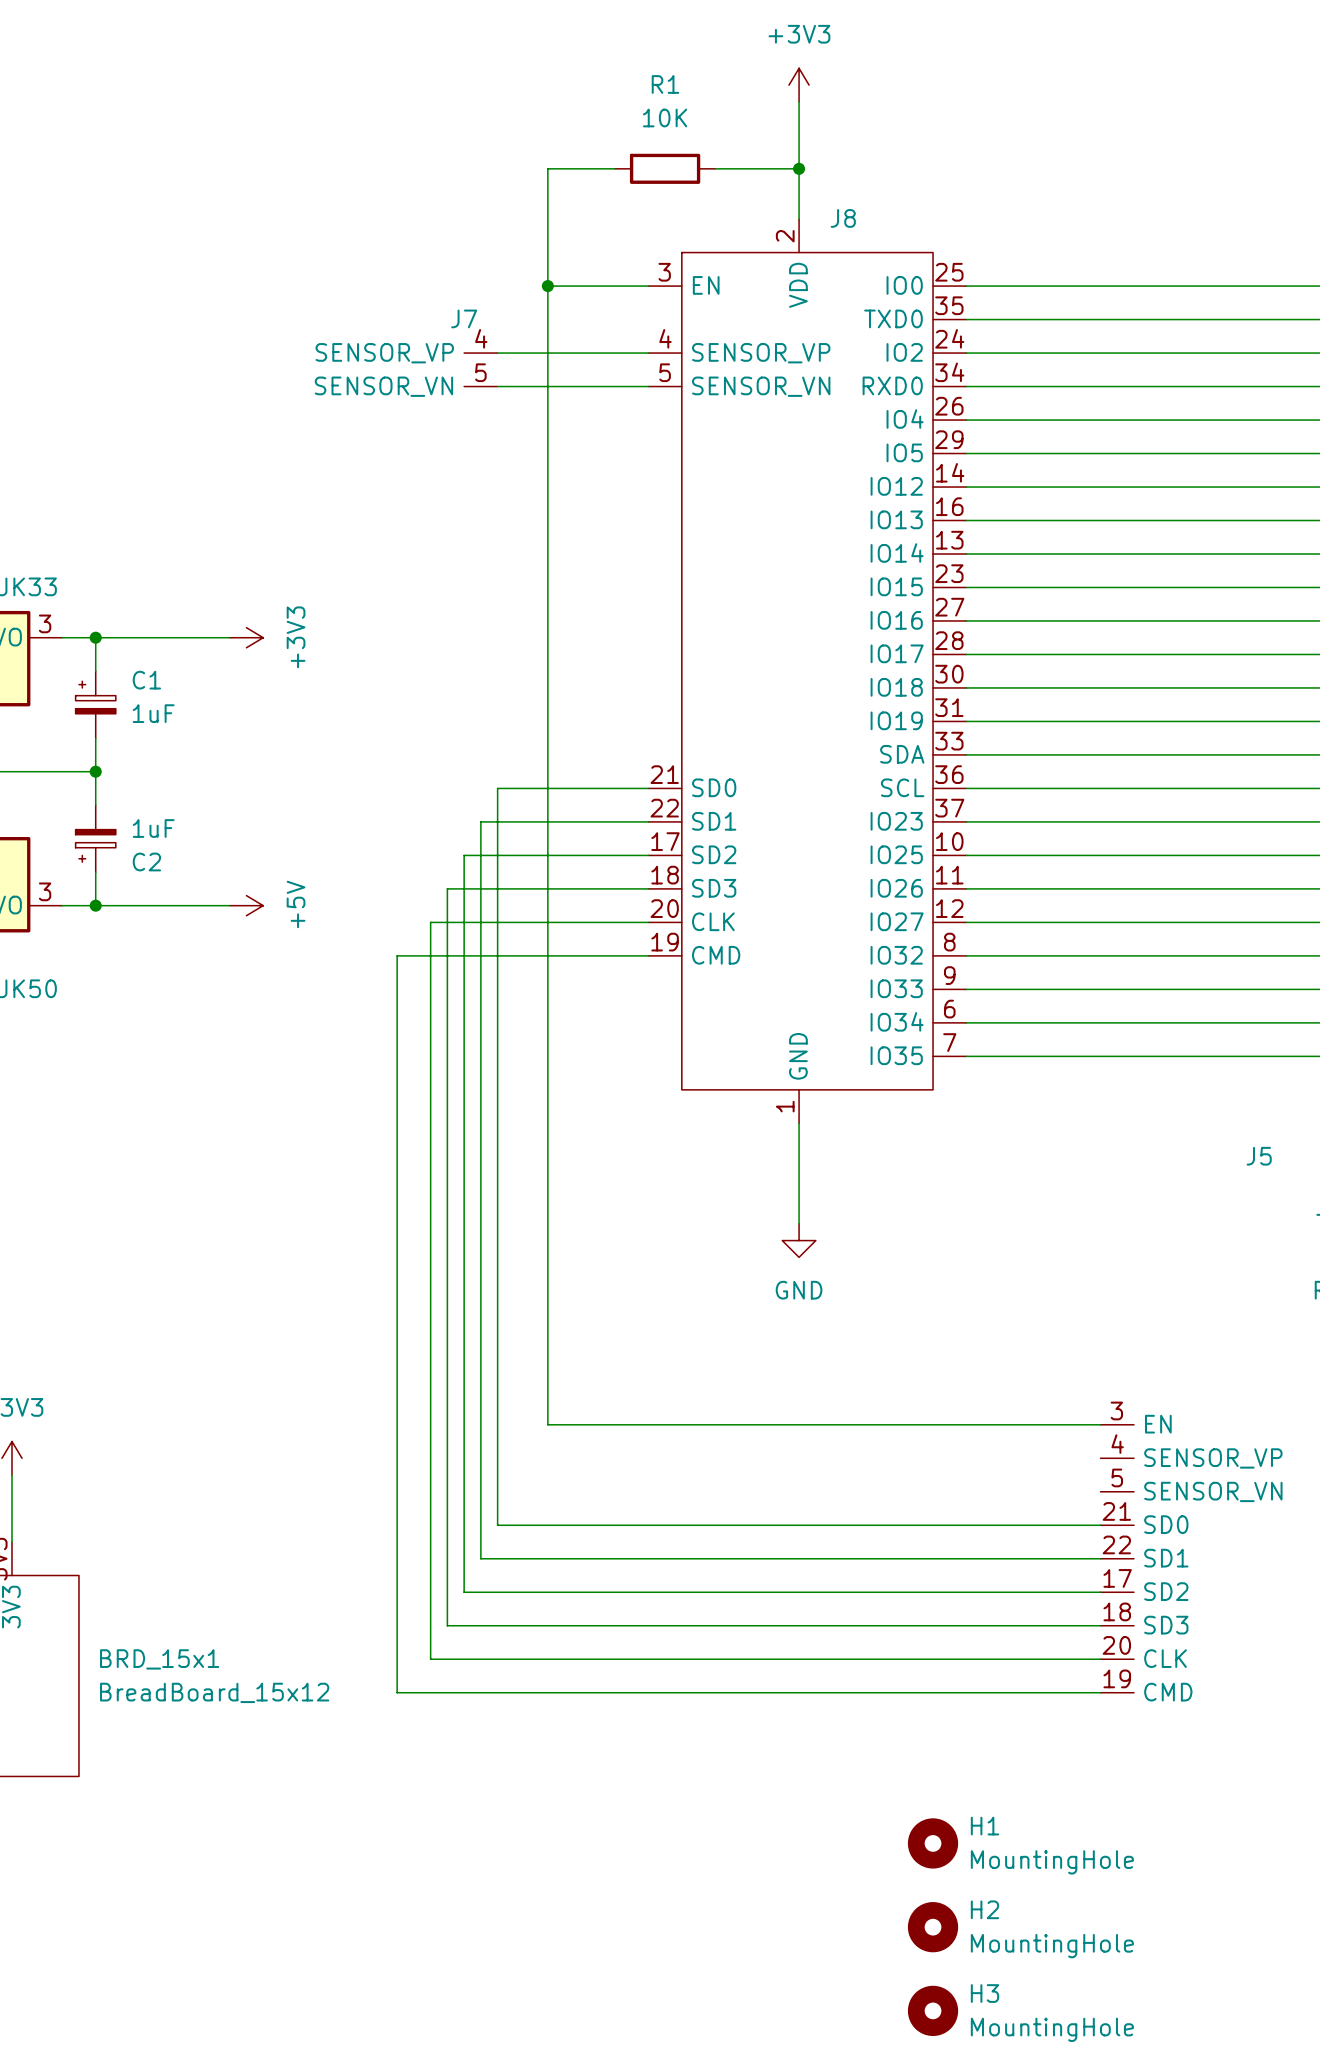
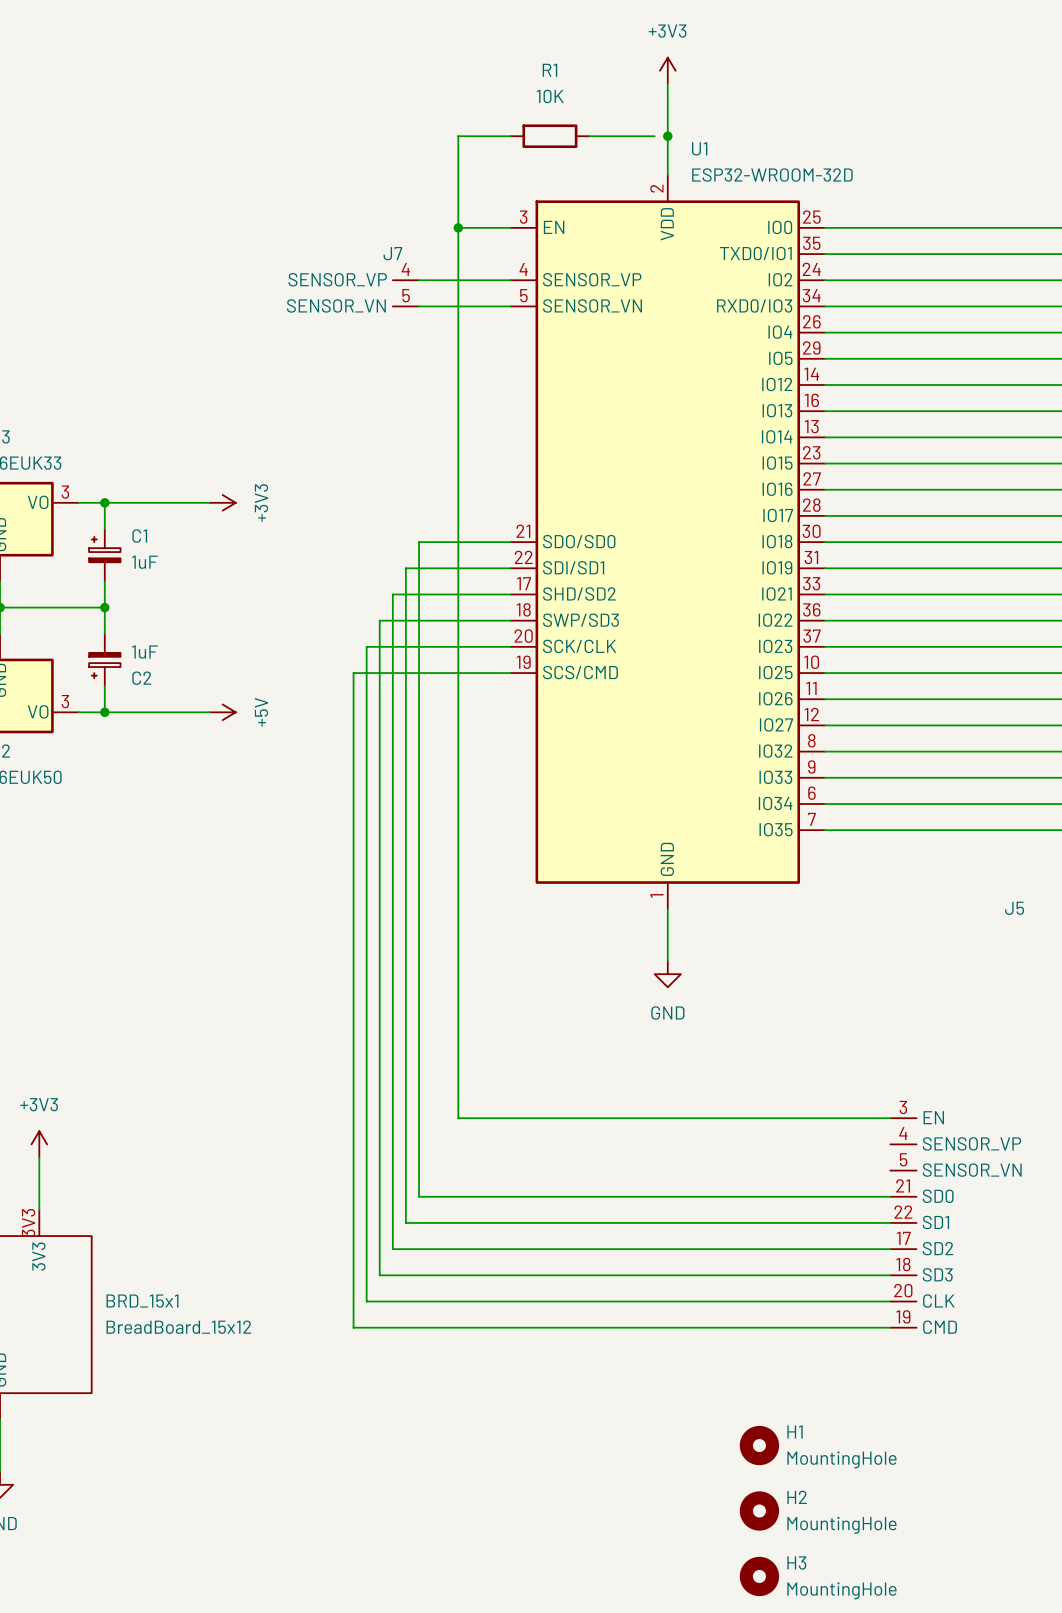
power symbol position: +3V3 (799, 85) -> +3V3 (667, 70)
wire: (799, 101) (799, 219) -> (667, 83) (667, 175)
junction position: (799, 168) -> (667, 136)
J8: (807, 671) -> none
U1: none -> ESP32-WROOM-32D (667, 542)
wire: (447, 888) (648, 888) -> (379, 699) (379, 620) (419, 620) (419, 542) (510, 542)
wire: (430, 922) (648, 922) -> (366, 725) (366, 646) (405, 646) (405, 568) (510, 568)
wire: (648, 955) (397, 955) (397, 1692) (413, 1692) -> (510, 594) (392, 594) (392, 673) (353, 673) (353, 1327)
wire: (799, 1123) (799, 1223) -> none
wire: none -> (667, 908) (667, 961)
power symbol position: GND (799, 1240) -> GND (667, 974)

